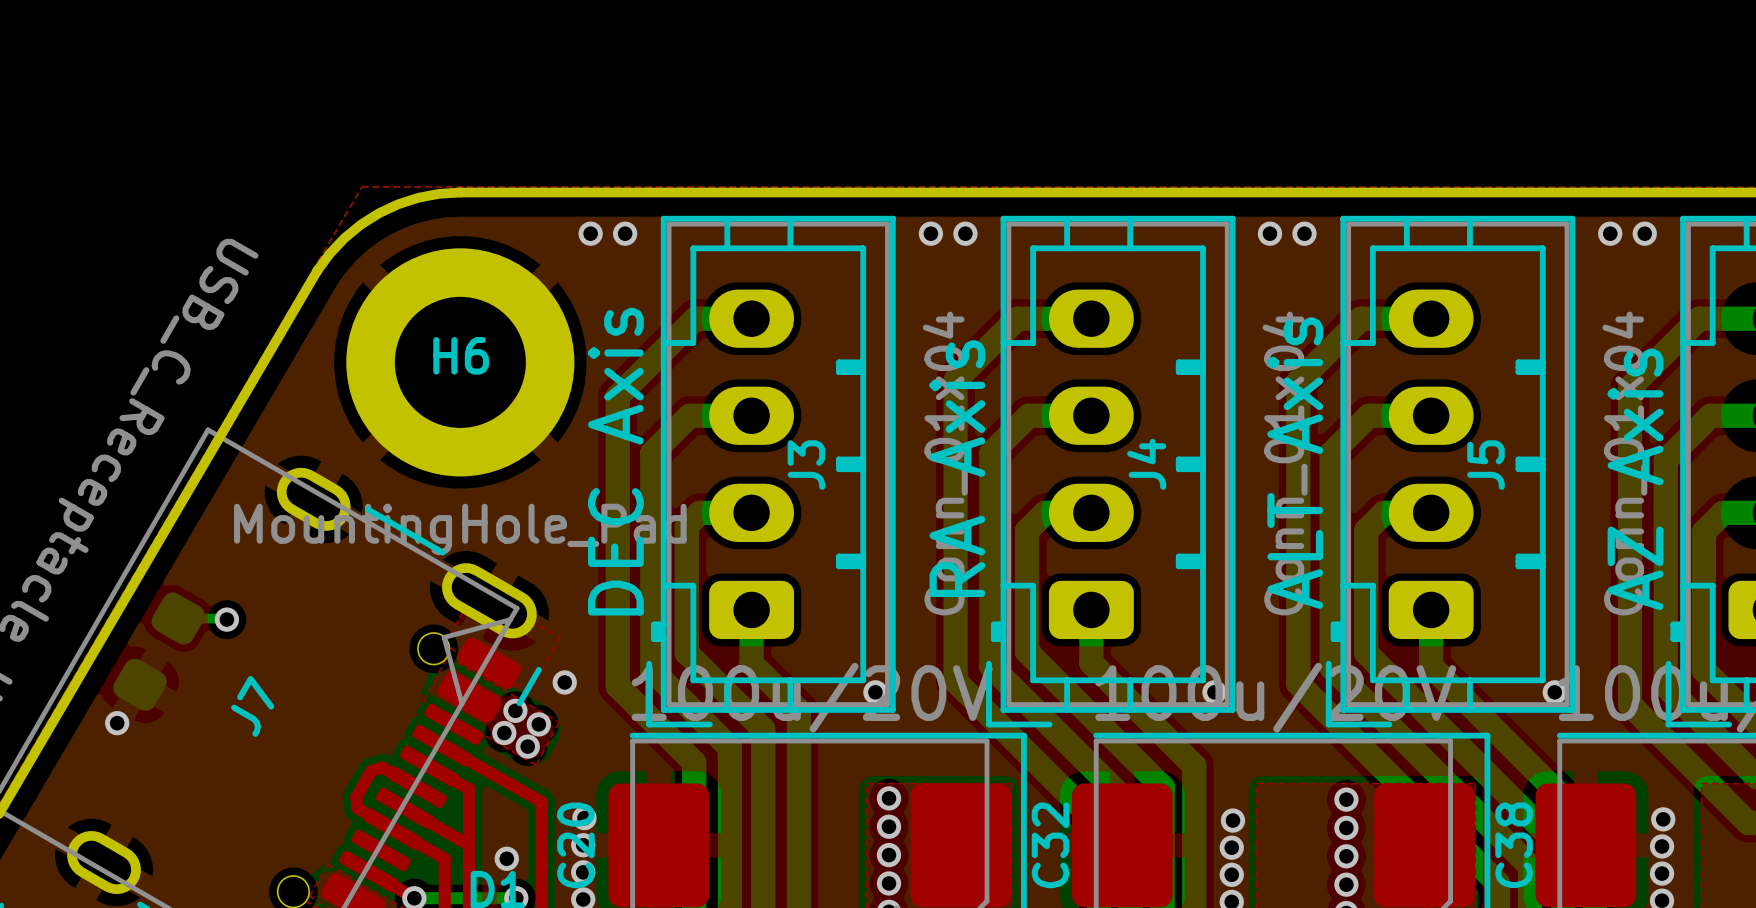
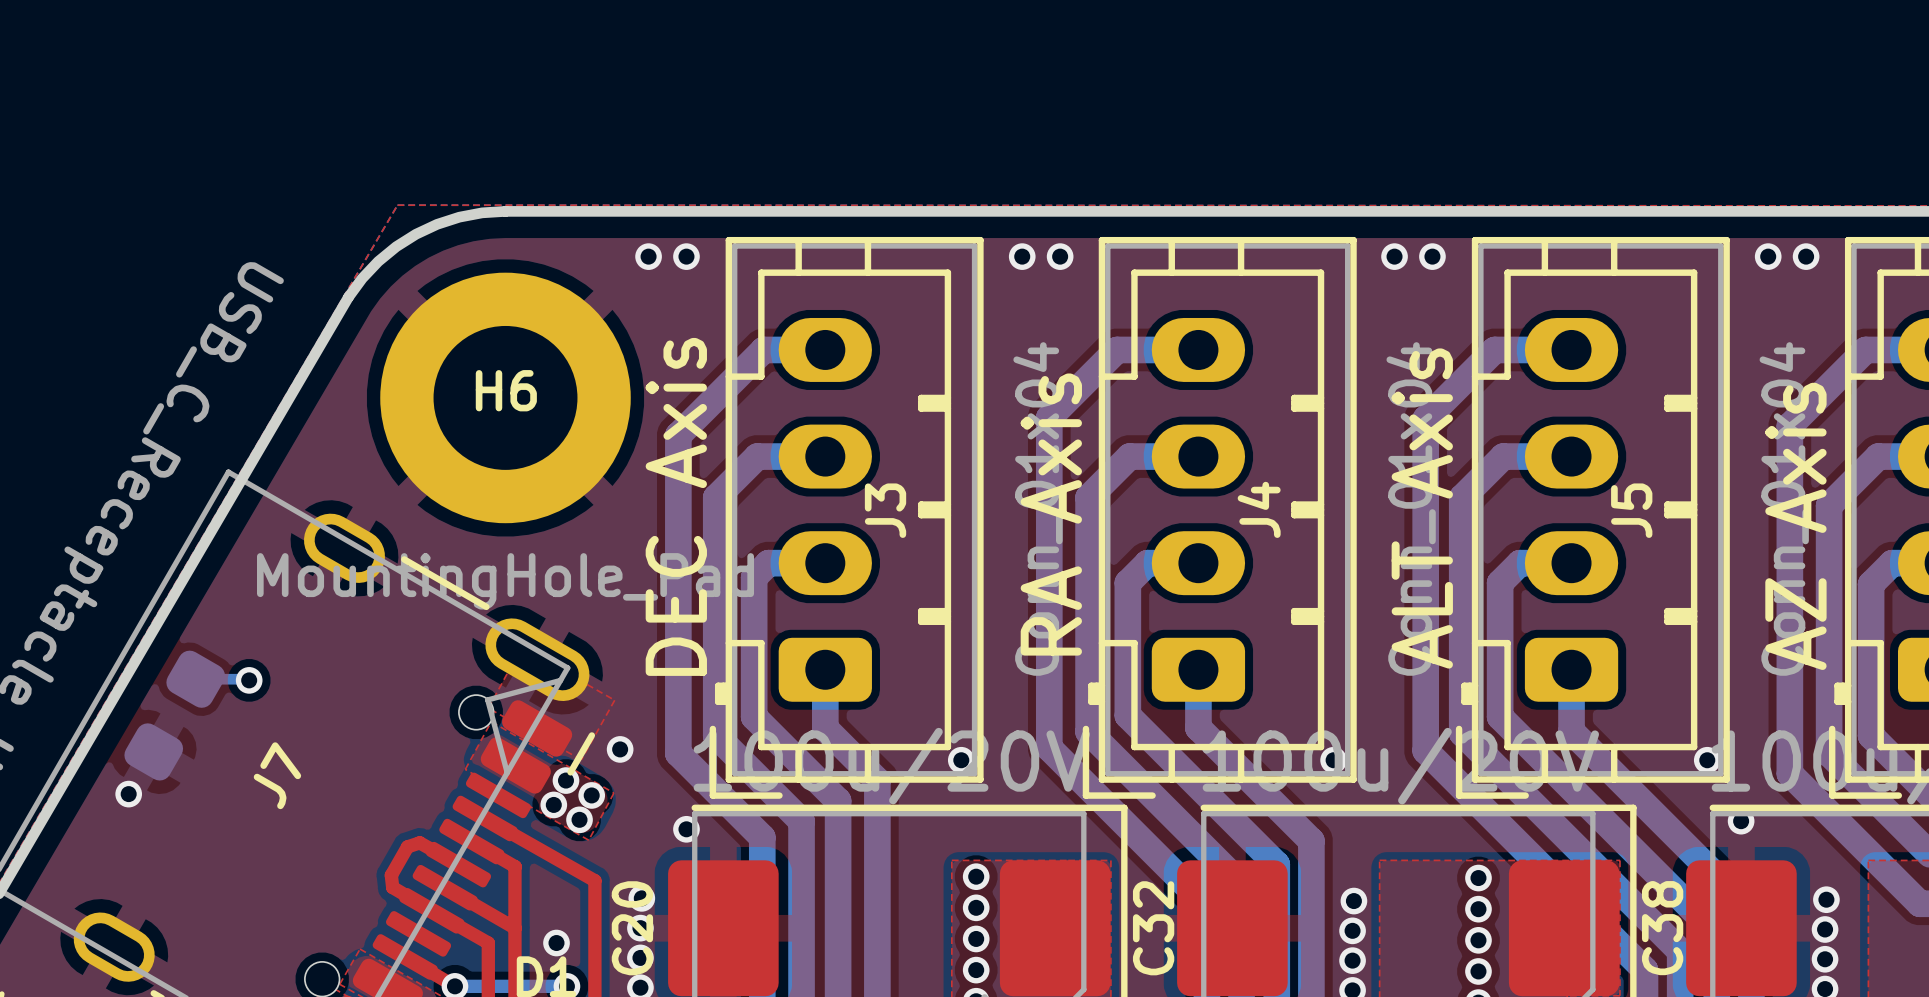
via: none -> (1741, 821)
via: none -> (686, 829)

